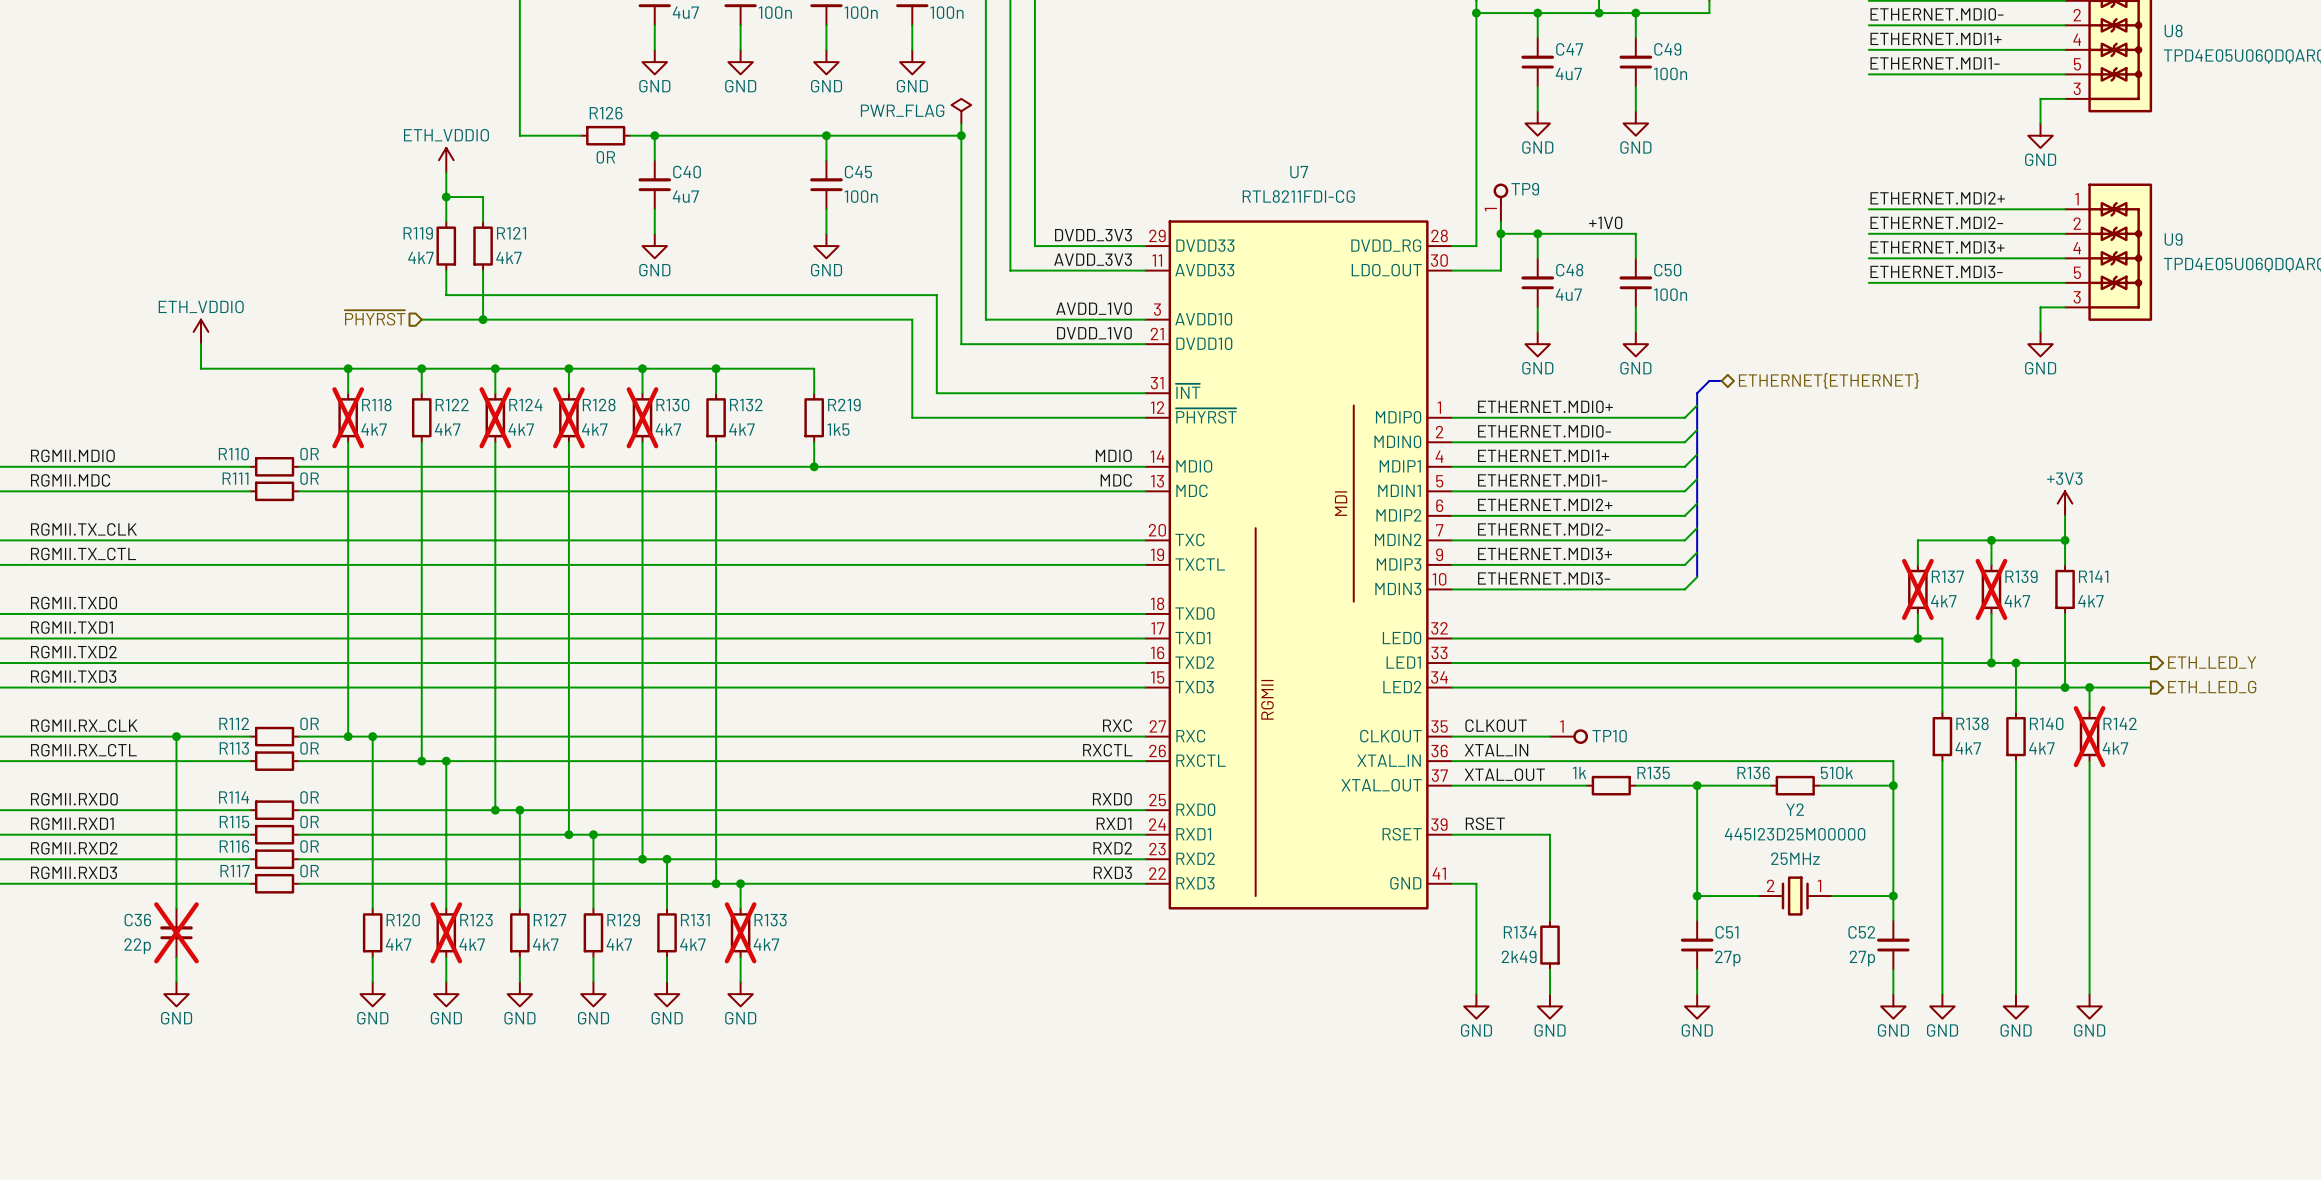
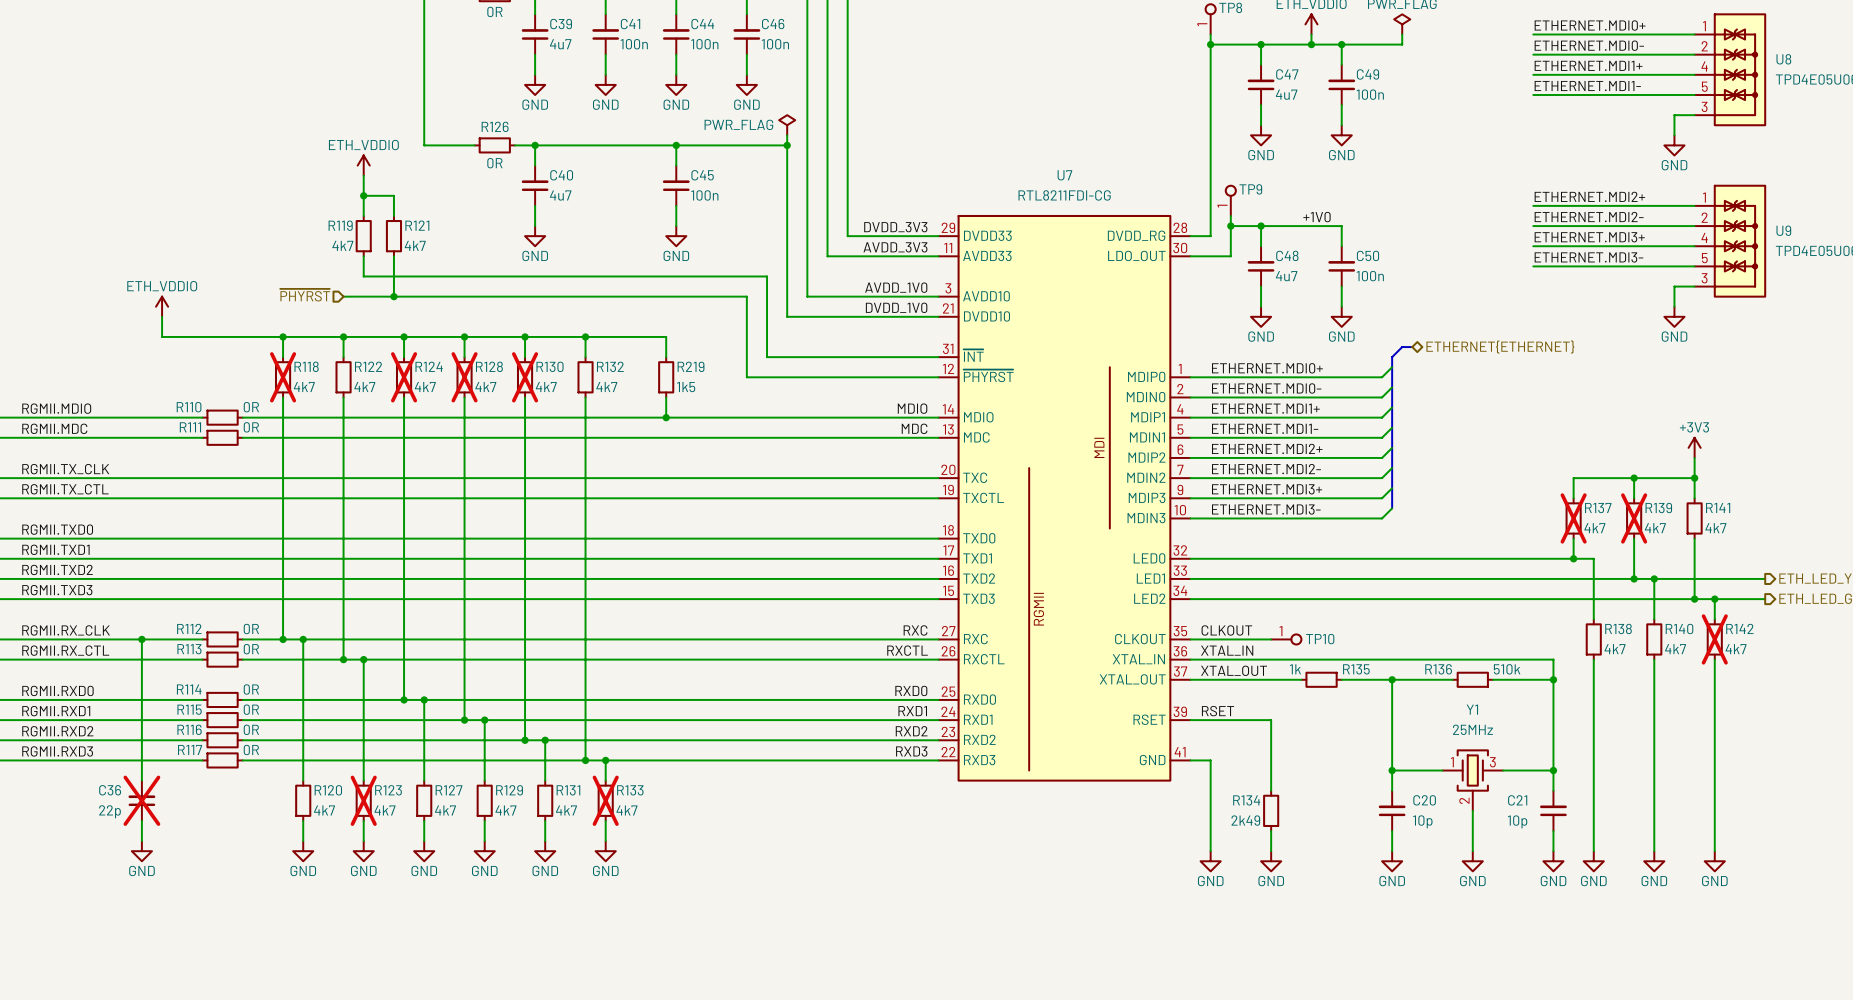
Y2: (1795, 896) -> none
Y1: none -> (1472, 780)
C51 name: C51 (1727, 932) -> C20 (1424, 800)
C52 name: C52 (1861, 932) -> C21 (1517, 800)
wire: none -> (1472, 810) (1472, 851)
C51 text: 27p (1727, 958) -> 10p (1422, 821)
C52 text: 27p (1862, 958) -> 10p (1517, 821)
power symbol: none -> GND (1472, 861)

